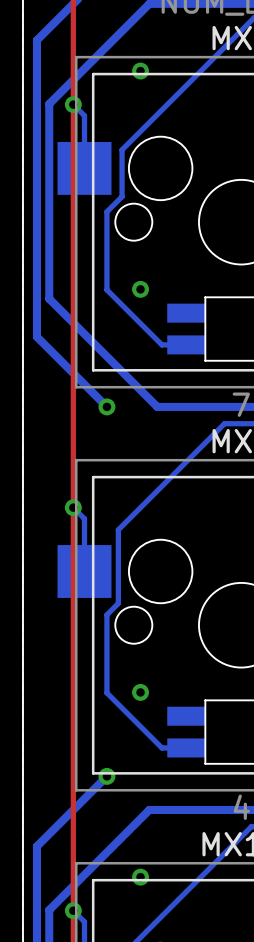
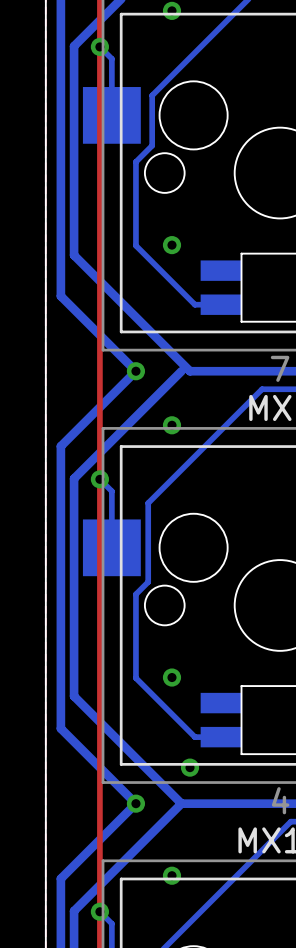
bottom track: none -> (181, 371) (74, 478) (74, 696) (181, 803)
via: none -> (171, 425)
bottom track: (106, 776) (36, 846) (36, 879) -> (135, 371) (60, 446) (60, 728) (135, 803) (60, 878)
via: (106, 776) -> none
via: none -> (190, 767)
via: none -> (135, 803)

